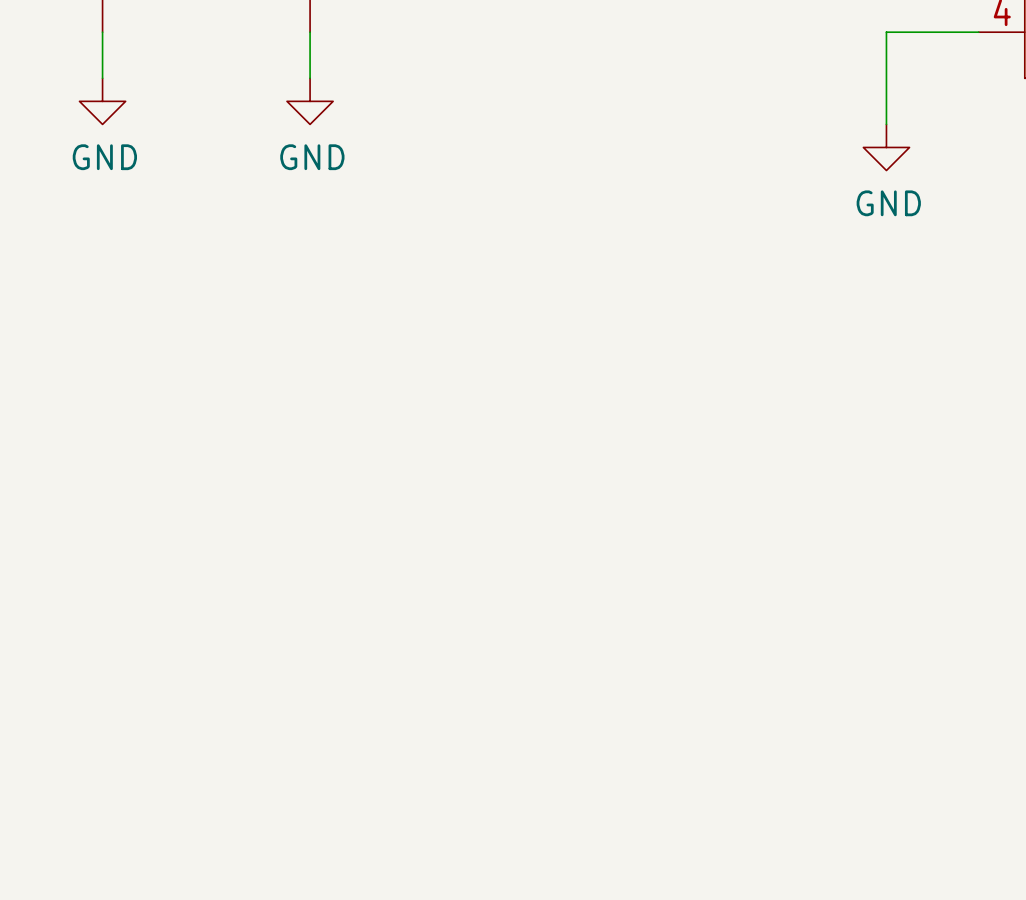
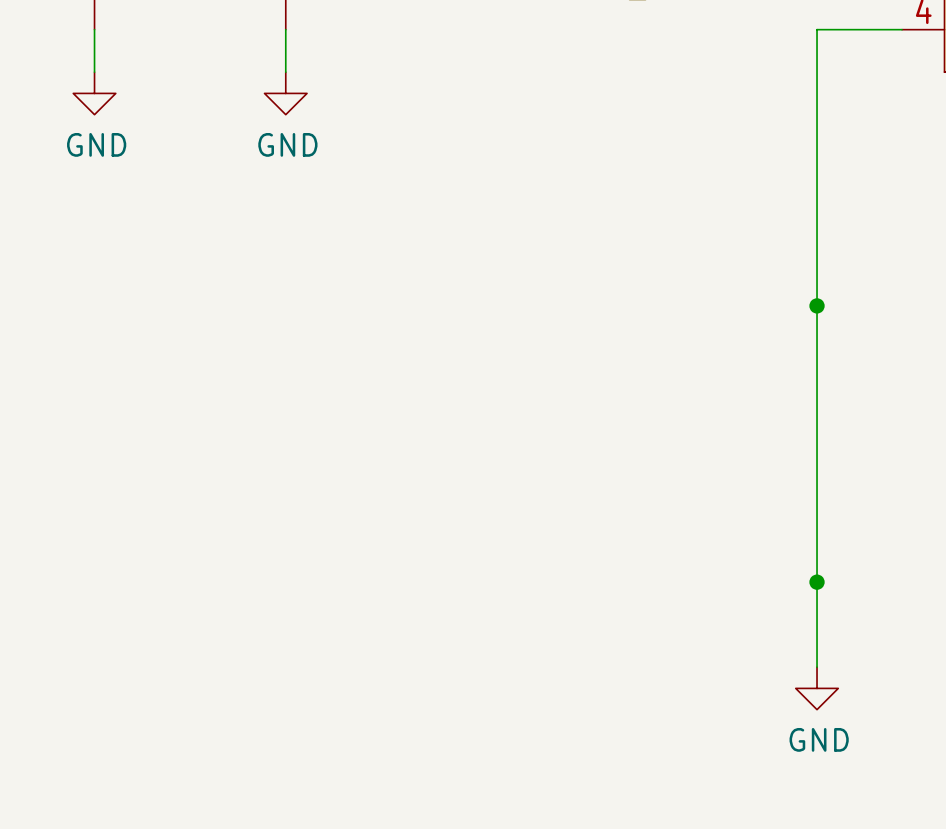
wire: none -> (817, 114) (817, 667)
power symbol: GND (886, 147) -> none
junction: none -> (817, 305)
junction: none -> (817, 582)
power symbol: none -> GND (817, 688)

